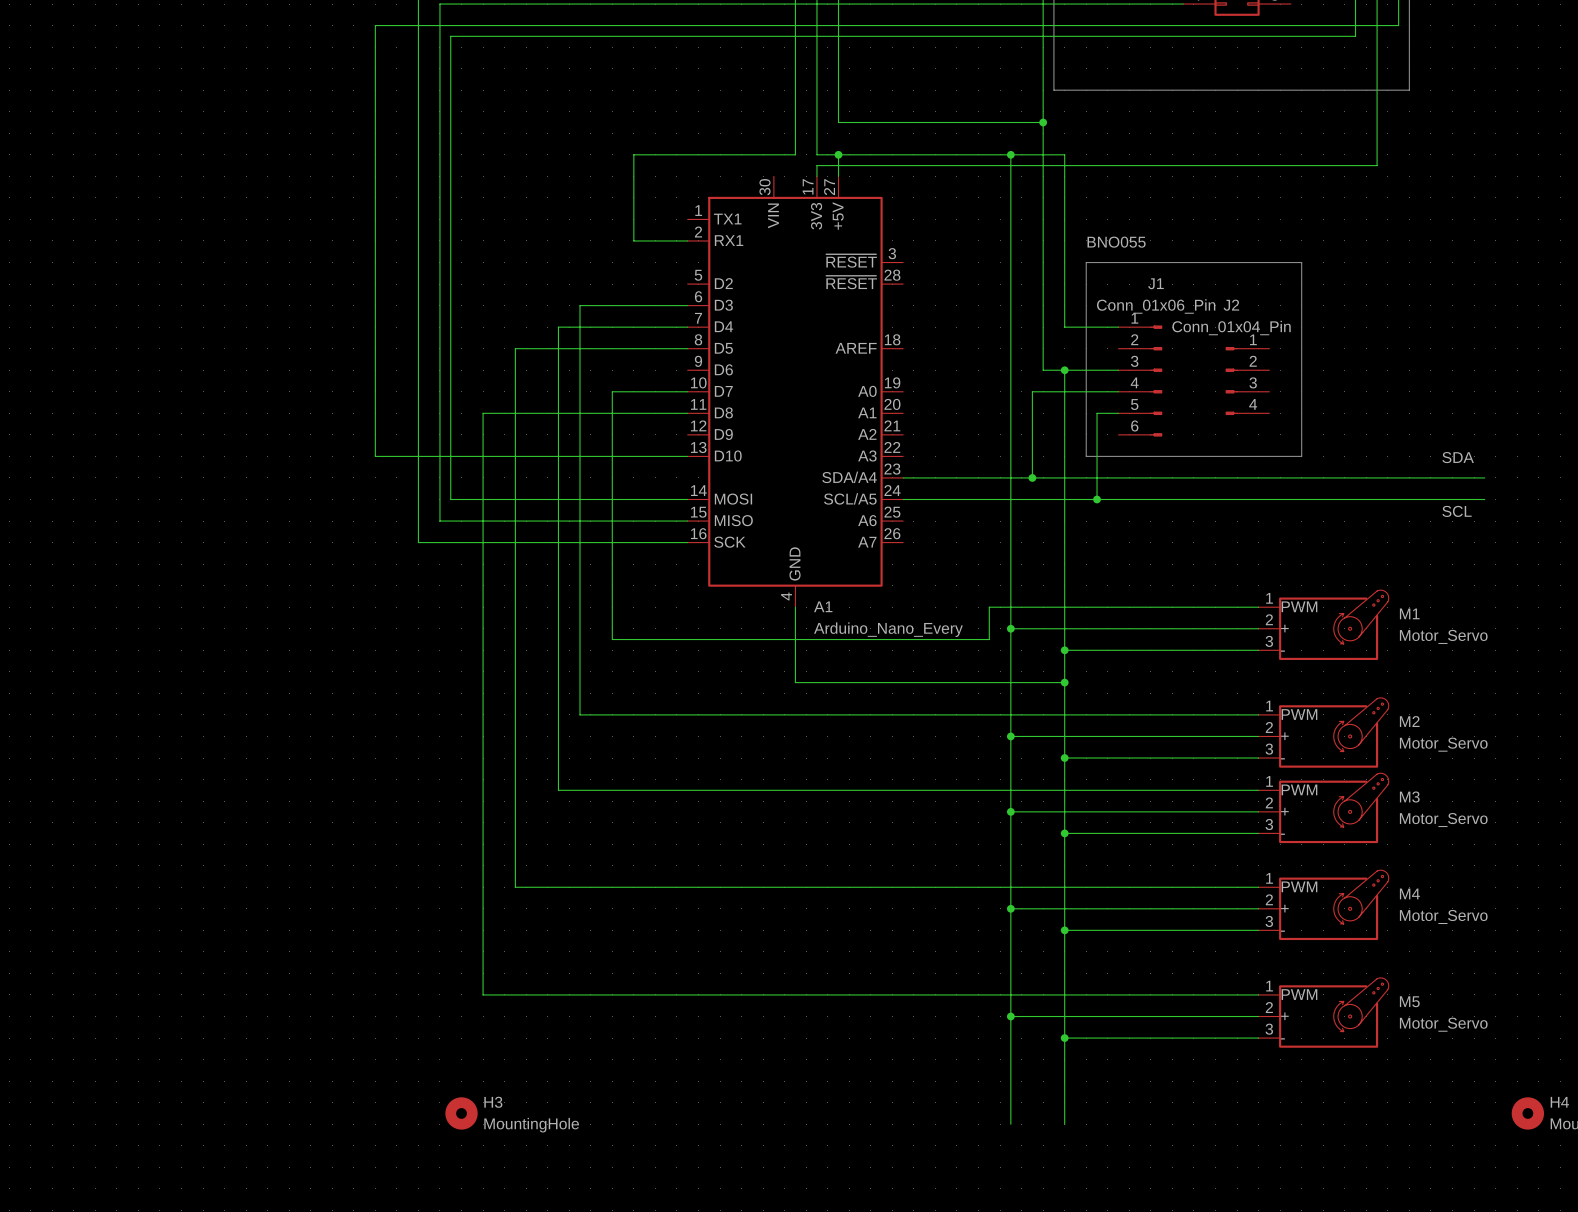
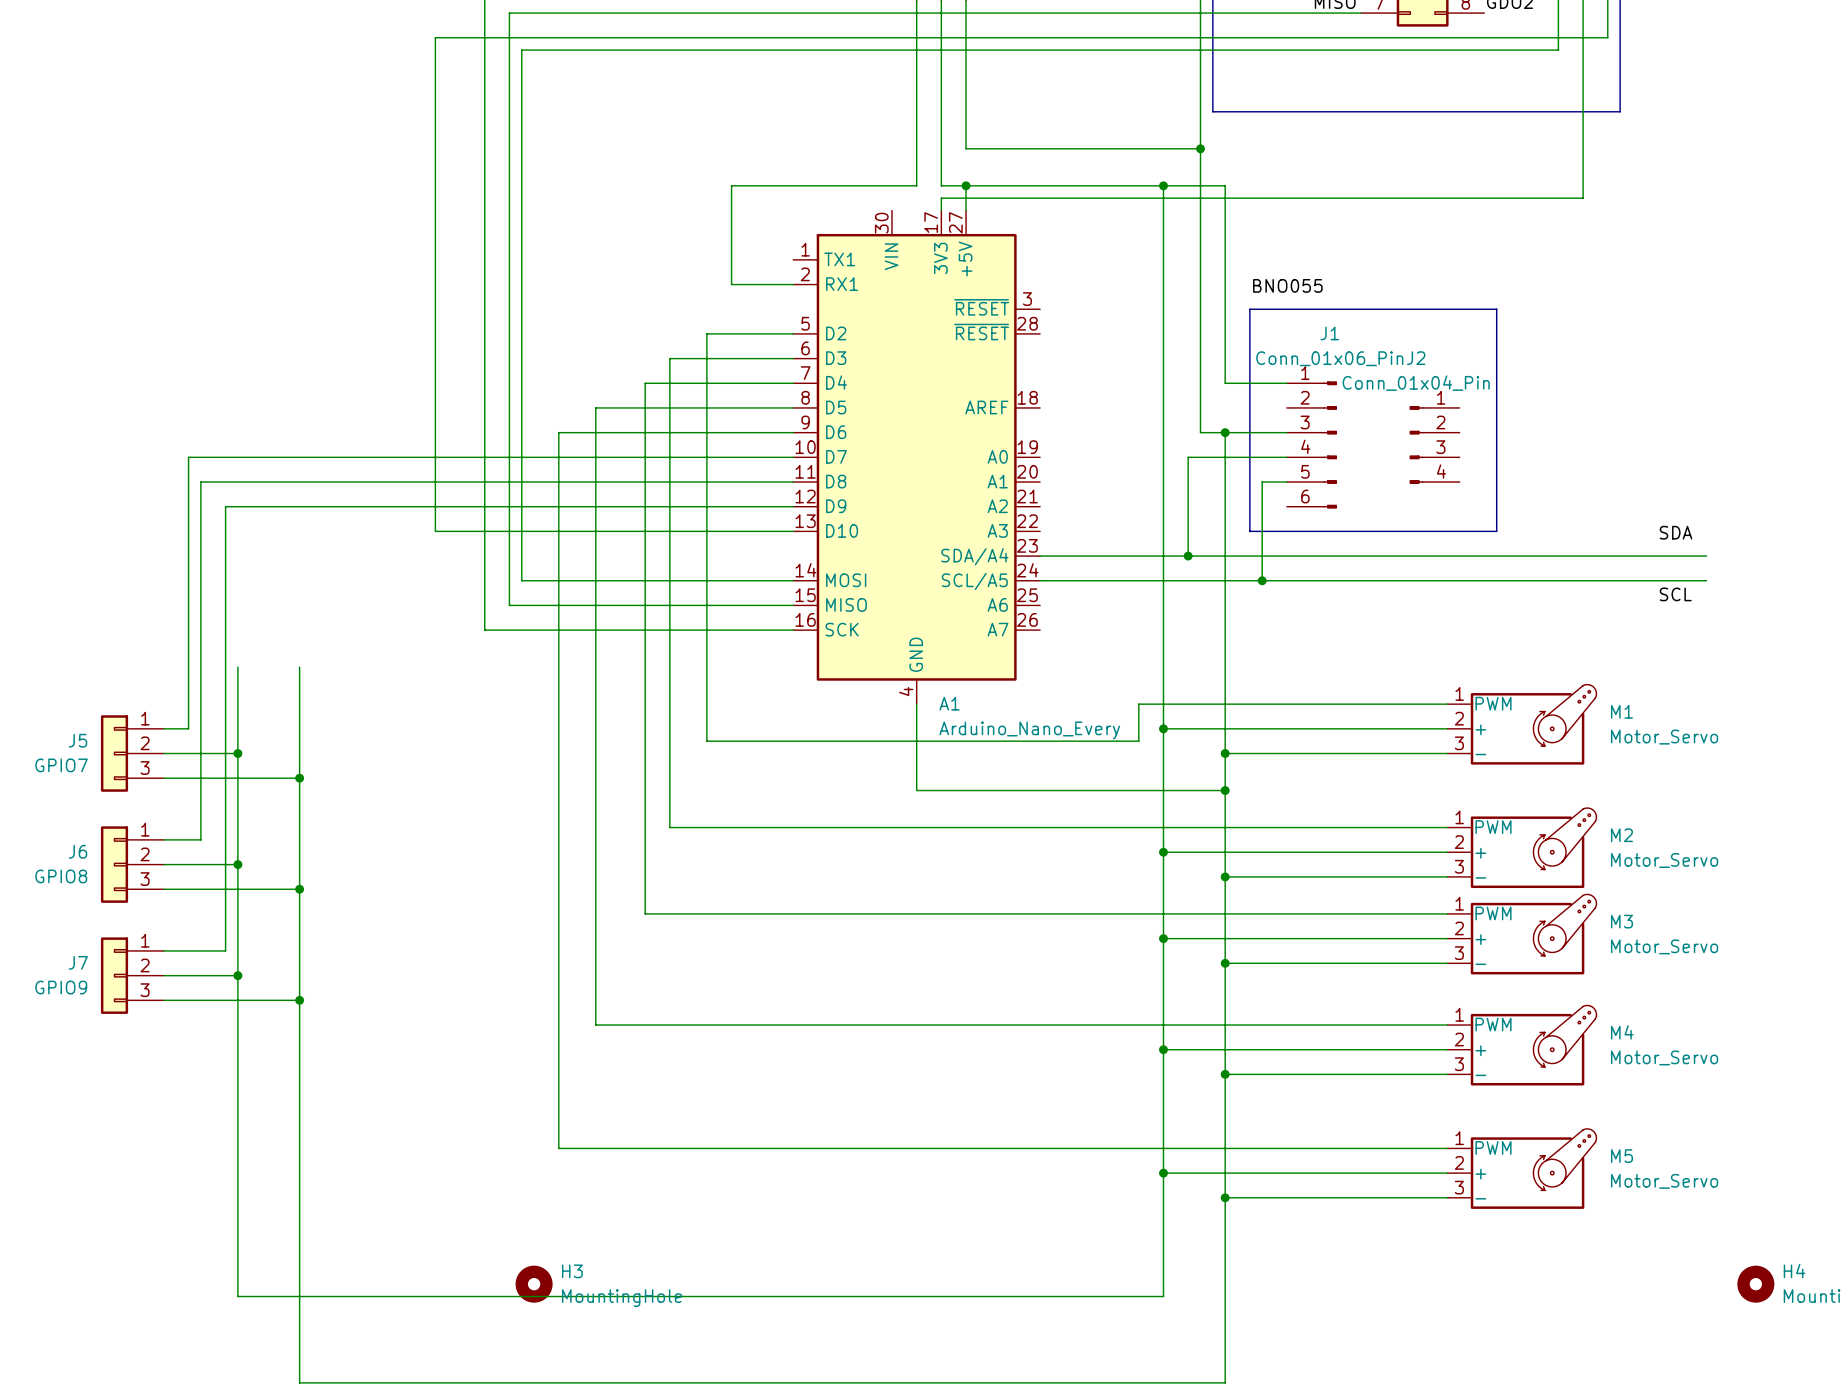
wire: none -> (793, 333) (706, 333) (706, 457) (188, 457) (188, 728) (163, 728)
wire: none -> (793, 432) (558, 432) (558, 482) (200, 482) (200, 839) (163, 839)
wire: none -> (793, 506) (225, 506) (225, 950) (163, 950)
wire: none -> (237, 667) (237, 1296) (1163, 1296)
wire: none -> (299, 667) (299, 1382) (1225, 1382) (1225, 1296)
J5: none -> GPIO7 (132, 753)
wire: none -> (163, 753) (237, 753)
junction: none -> (237, 753)
wire: none -> (163, 778) (299, 778)
junction: none -> (299, 778)
J6: none -> GPIO8 (132, 864)
wire: none -> (163, 864) (237, 864)
junction: none -> (237, 864)
wire: none -> (163, 889) (299, 889)
junction: none -> (299, 889)
J7: none -> GPIO9 (132, 975)
wire: none -> (163, 975) (237, 975)
junction: none -> (237, 975)
wire: none -> (163, 1000) (299, 1000)
junction: none -> (299, 1000)

